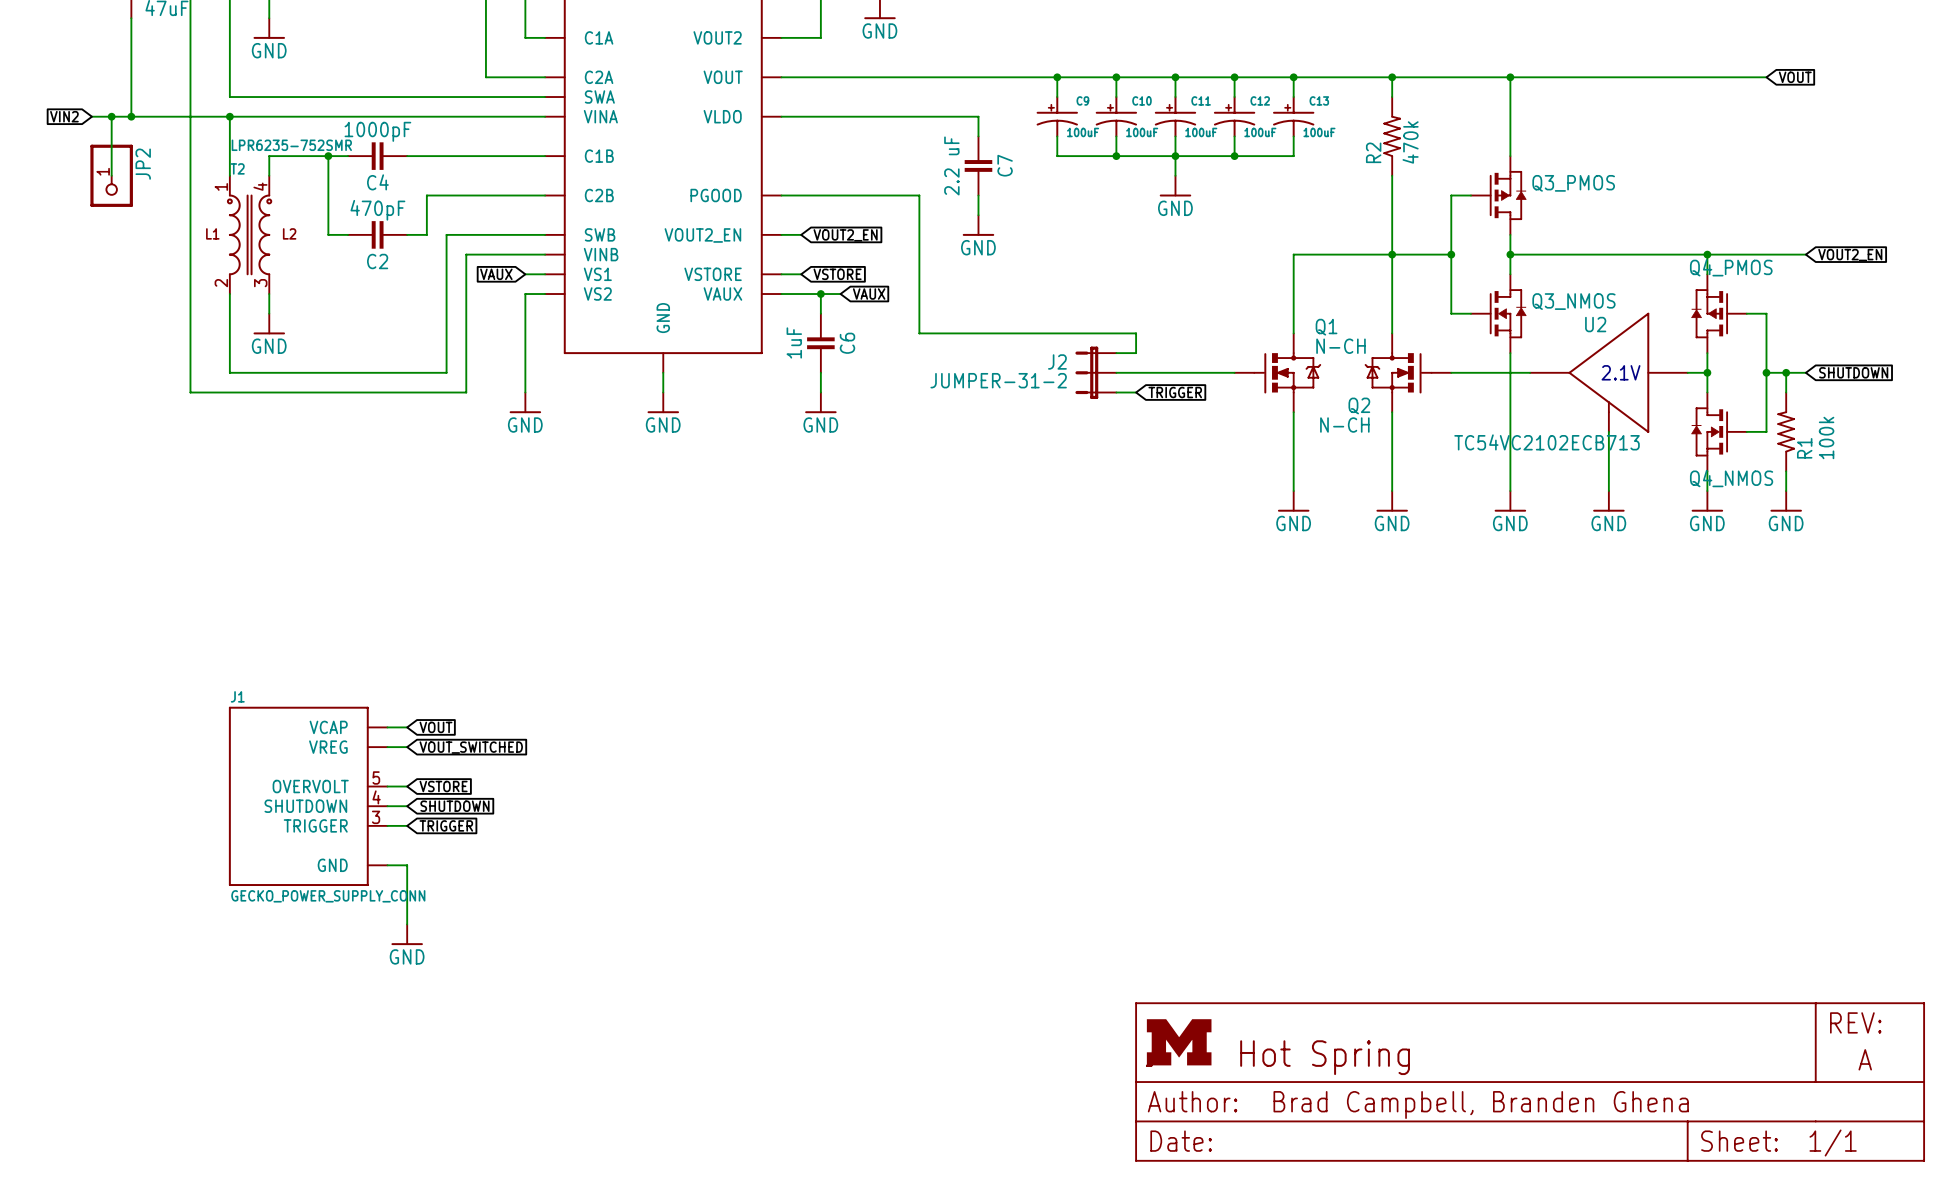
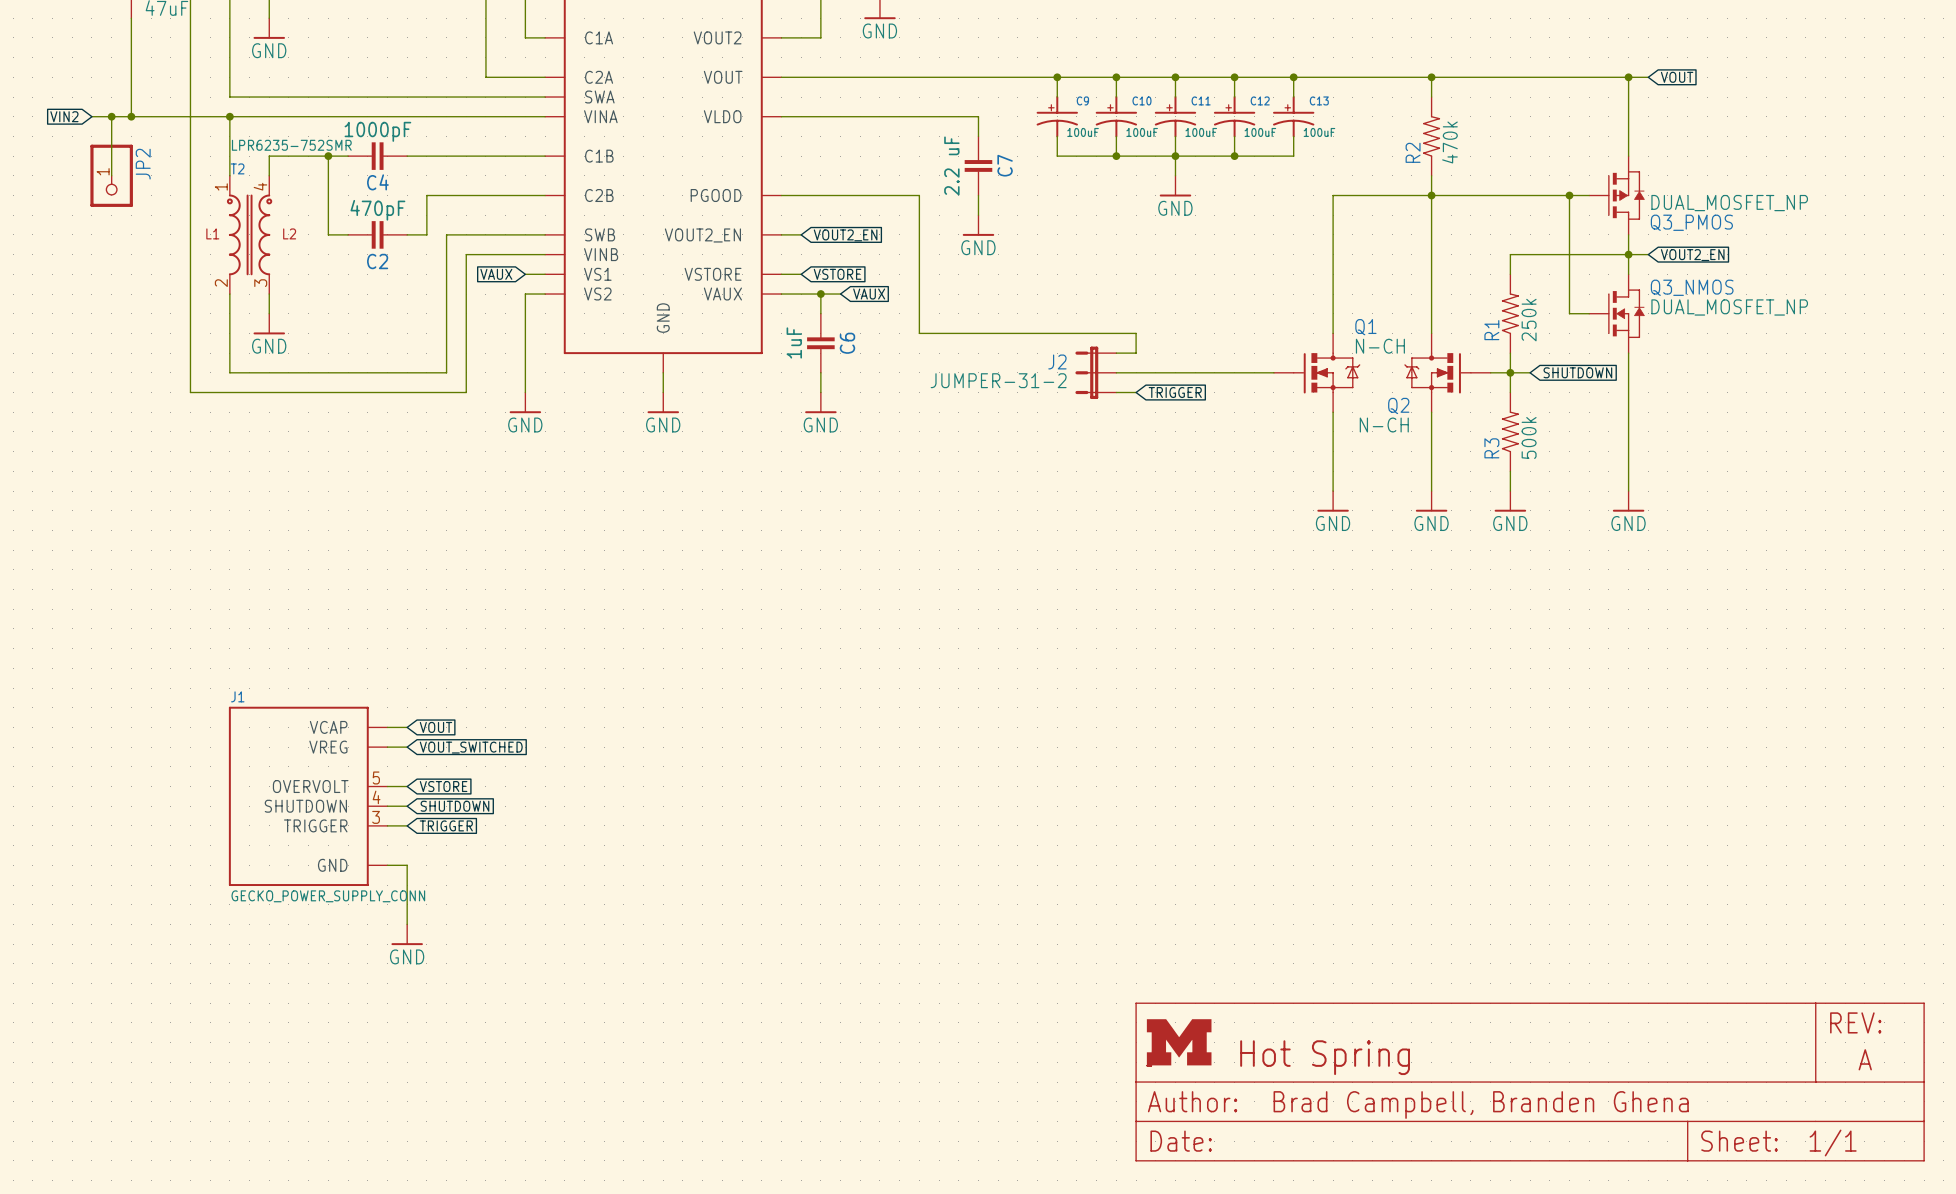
wire: (1392, 77) (1392, 97) -> (1431, 77) (1431, 97)
junction: (1392, 77) -> none
junction: none -> (1431, 77)
wire: (1510, 77) (1510, 156) -> (1628, 77) (1628, 156)
junction: (1510, 77) -> none
junction: none -> (1628, 77)
wire: (1648, 77) (1766, 77) -> none
global label position: VOUT (1795, 77) -> VOUT (1677, 77)
R2 position: (1392, 136) -> (1431, 136)
wire: (1392, 175) (1392, 333) -> (1431, 175) (1431, 333)
Q3_PMOS name position: Q3_PMOS (1573, 183) -> Q3_PMOS (1691, 222)
junction: none -> (1431, 195)
wire: (1451, 195) (1451, 313) (1470, 313) -> (1451, 195) (1333, 195) (1333, 333)
wire: none -> (1470, 195) (1589, 195)
Q3_PMOS position: (1498, 195) -> (1616, 195)
wire: none -> (1569, 195) (1569, 313) (1589, 313)
junction: none -> (1569, 195)
Q3_PMOS value: none -> DUAL_MOSFET_NP (1729, 203)
wire: (1510, 234) (1510, 254) -> none
junction: (1392, 254) -> none
wire: (1451, 254) (1293, 254) (1293, 333) -> none
junction: (1451, 254) -> none
junction: (1510, 254) -> none
junction: none -> (1628, 254)
wire: (1648, 254) (1805, 254) -> none
wire: (1707, 254) (1707, 274) -> none
junction: (1707, 254) -> none
global label position: VOUT2_EN (1850, 255) -> VOUT2_EN (1692, 255)
Q3_NMOS name position: Q3_NMOS (1573, 301) -> Q3_NMOS (1692, 287)
Q3_NMOS value: none -> DUAL_MOSFET_NP (1729, 307)
Q3_NMOS position: (1498, 313) -> (1616, 313)
Q4_PMOS: (1719, 313) -> none
wire: (1746, 313) (1766, 313) (1766, 431) (1746, 431) -> none
text position: N-CH (1341, 346) -> N-CH (1380, 346)
wire: none -> (1628, 353) (1628, 491)
wire: (1707, 353) (1707, 392) -> (1628, 234) (1628, 274)
Q1 position: (1277, 372) -> (1317, 372)
Q2 position: (1408, 372) -> (1447, 372)
junction: none -> (1510, 372)
global label: none -> SHUTDOWN (1577, 372)
U2: TC54VC2102ECB713 (1608, 372) -> none
text: 2.1V (1621, 372) -> none
wire: (1687, 372) (1707, 372) -> none
junction: (1707, 372) -> none
wire: (1766, 372) (1805, 372) -> none
junction: (1766, 372) -> none
wire: (1786, 372) (1786, 392) -> none
junction: (1786, 372) -> none
global label: SHUTDOWN (1853, 372) -> none
wire: (1293, 412) (1293, 491) -> (1333, 412) (1333, 491)
wire: (1392, 412) (1392, 491) -> (1431, 412) (1431, 491)
text position: N-CH (1344, 425) -> N-CH (1384, 425)
R3: none -> 500k (1510, 431)
wire: (1608, 431) (1608, 491) -> none
Q4_NMOS: (1719, 431) -> none
R1 flip: as is (1786, 431) -> left-right (1510, 313)
R1 position: (1786, 431) -> (1510, 313)
R1 value: 100k (1826, 437) -> 250k (1529, 320)
wire: (1707, 471) (1707, 491) -> none
wire: (1786, 471) (1786, 491) -> none
power symbol: GND (1293, 501) -> none
power symbol: none -> GND (1333, 501)
power symbol: GND (1392, 501) -> none
power symbol: none -> GND (1431, 501)
power symbol position: GND (1608, 501) -> GND (1628, 501)
power symbol: GND (1707, 501) -> none
power symbol: GND (1786, 501) -> none

